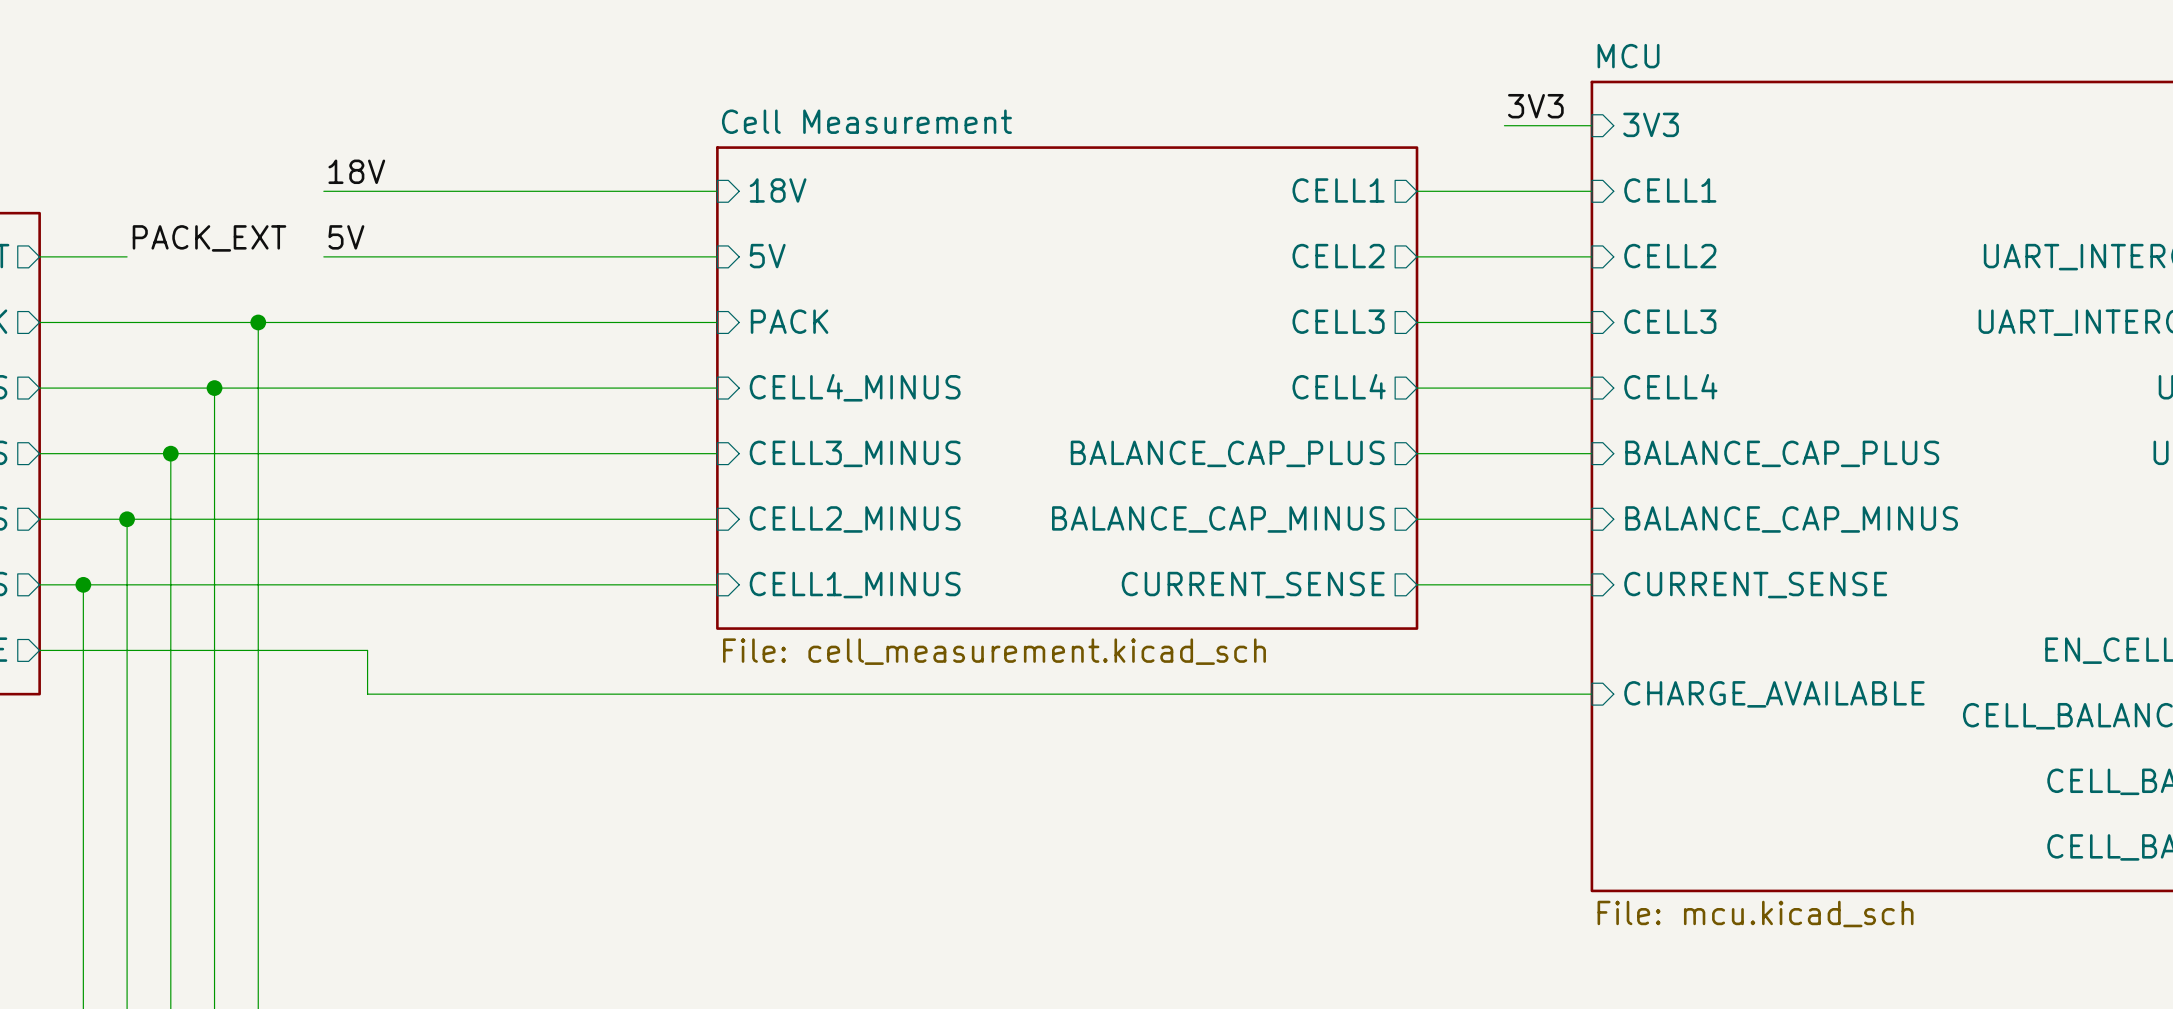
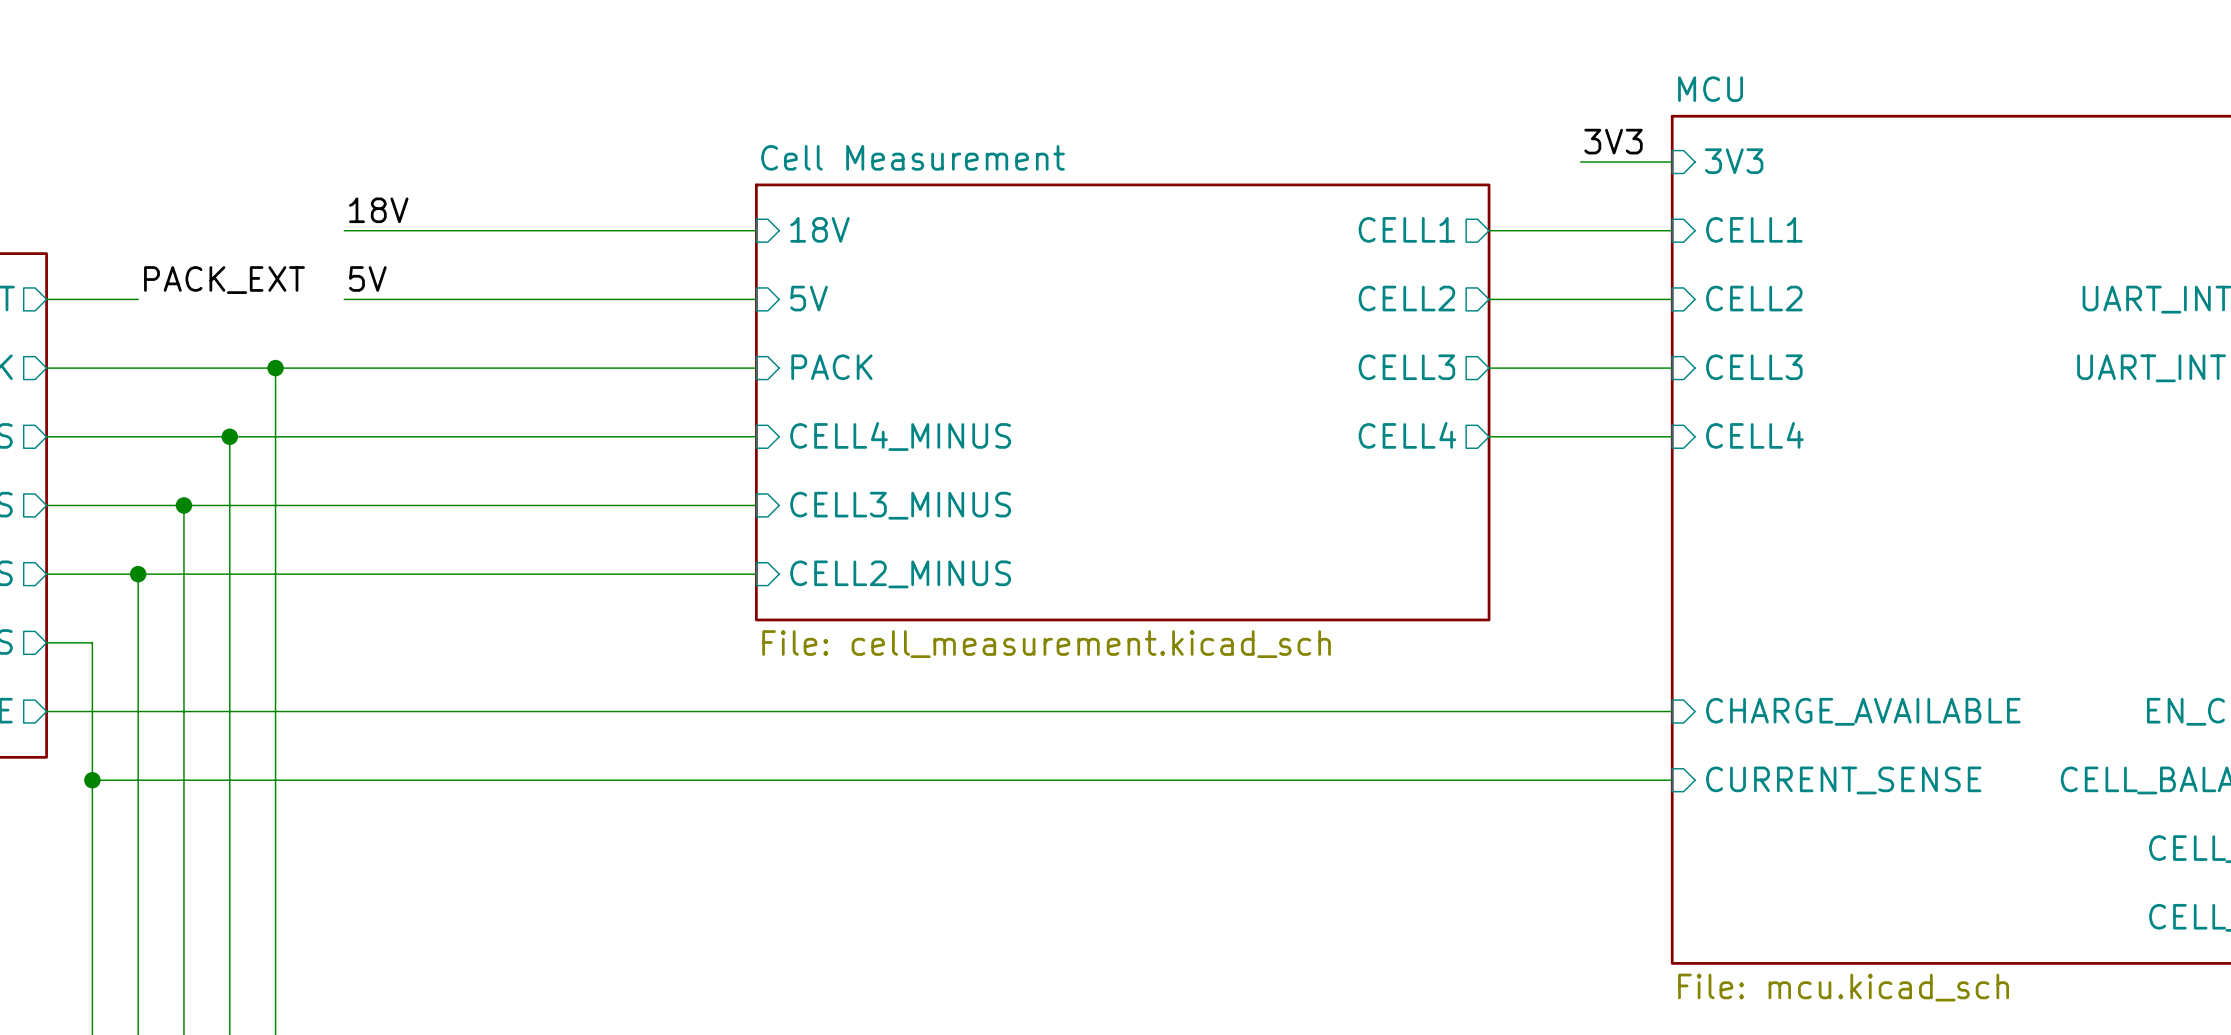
sheet Cell Measurement: none -> File: cell_measurement.kicad_sch (1122, 402)
sheet Cell Measurement: File: cell_measurement.kicad_sch (1067, 388) -> none
sheet pin: BALANCE_CAP_PLUS (1227, 453) -> none
wire: (1417, 453) (1591, 453) -> none
sheet pin: BALANCE_CAP_PLUS (1782, 453) -> none
sheet pin: BALANCE_CAP_MINUS (1218, 519) -> none
wire: (1417, 519) (1591, 519) -> none
sheet pin: BALANCE_CAP_MINUS (1791, 519) -> none
wire: (83, 584) (717, 584) -> none
junction: (83, 584) -> none
wire: (1417, 584) (1591, 584) -> none
sheet pin: CELL1_MINUS (855, 585) -> none
sheet pin: CURRENT_SENSE (1253, 585) -> none
sheet pin position: CURRENT_SENSE (1755, 585) -> CURRENT_SENSE (1843, 780)
wire: (367, 650) (367, 694) (1591, 694) -> (390, 711) (1672, 711)
sheet pin position: CHARGE_AVAILABLE (1774, 694) -> CHARGE_AVAILABLE (1863, 711)
wire: none -> (92, 780) (1672, 780)
junction: none -> (92, 780)

